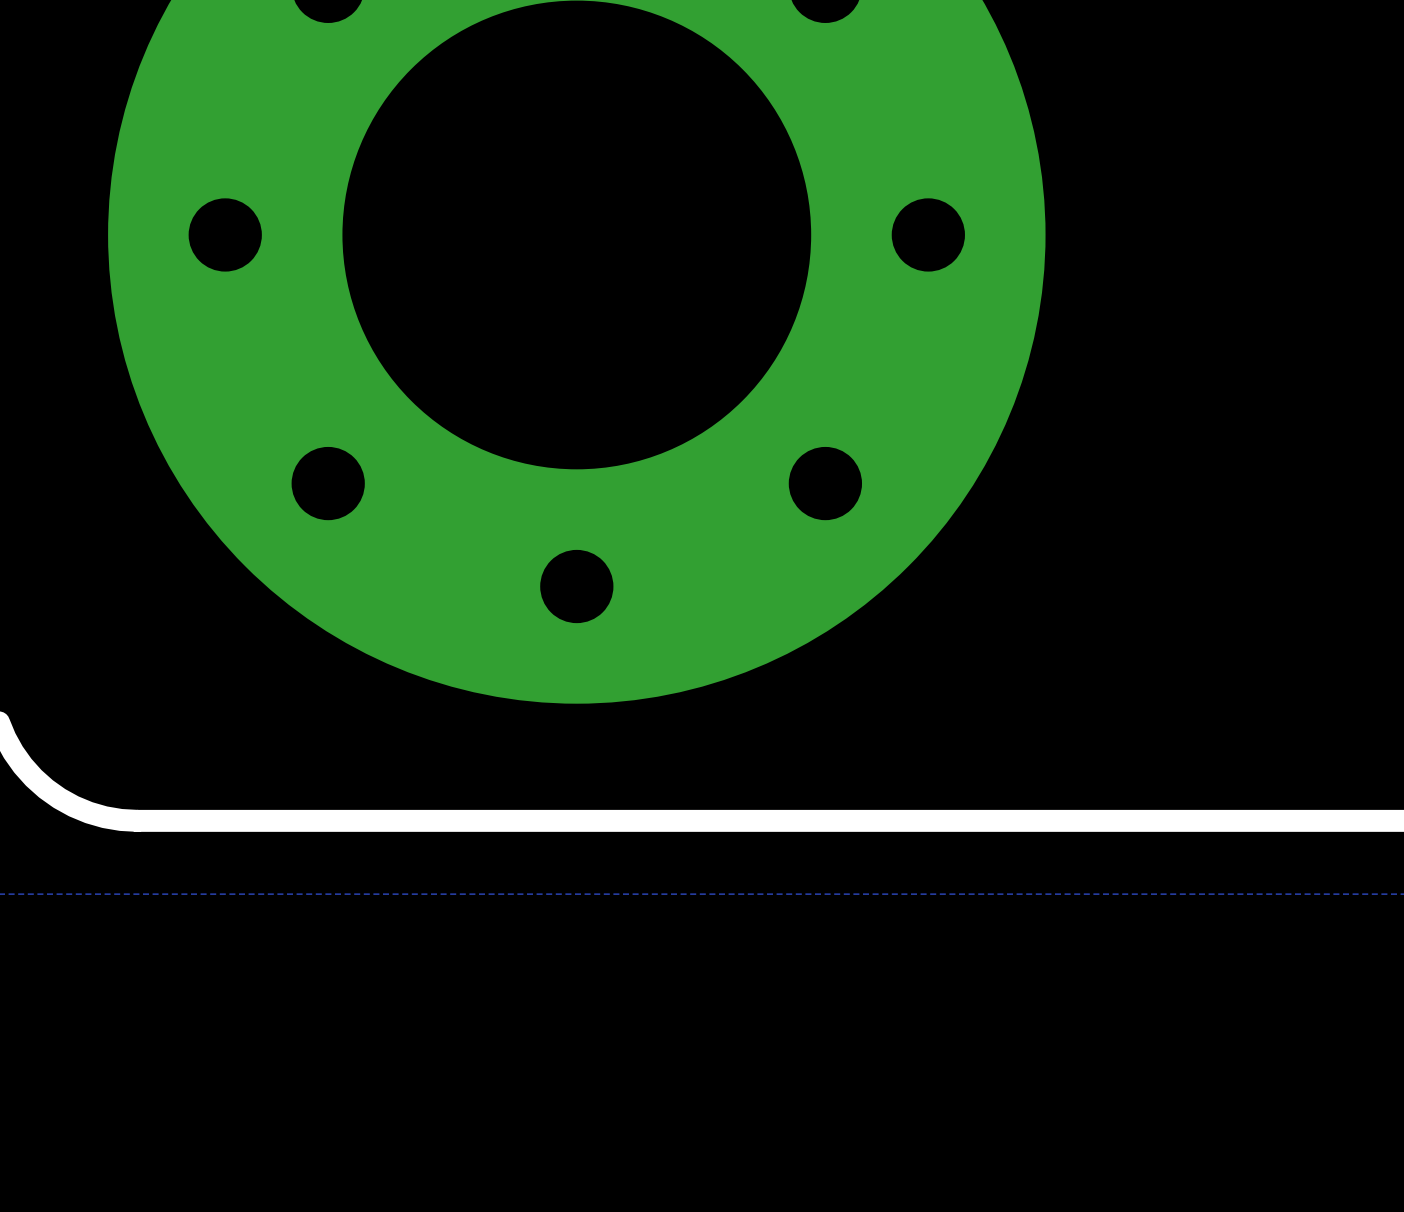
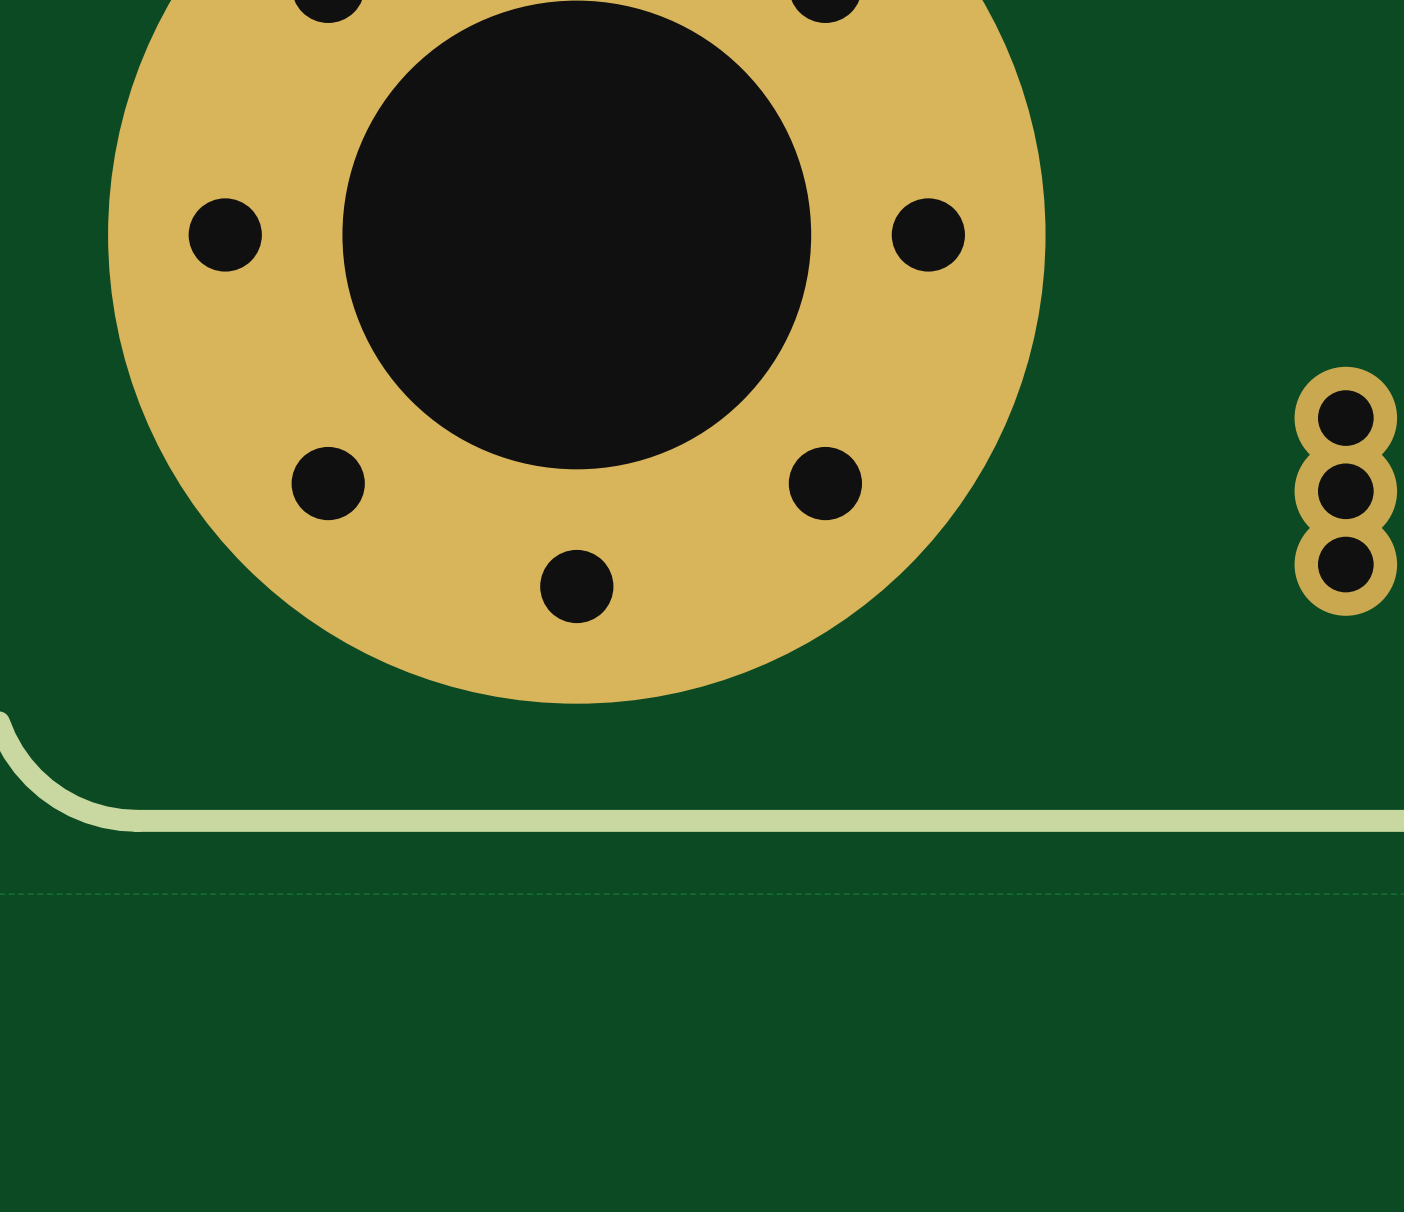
via: none -> (1345, 418)
via: none -> (1345, 491)
via: none -> (1345, 564)

